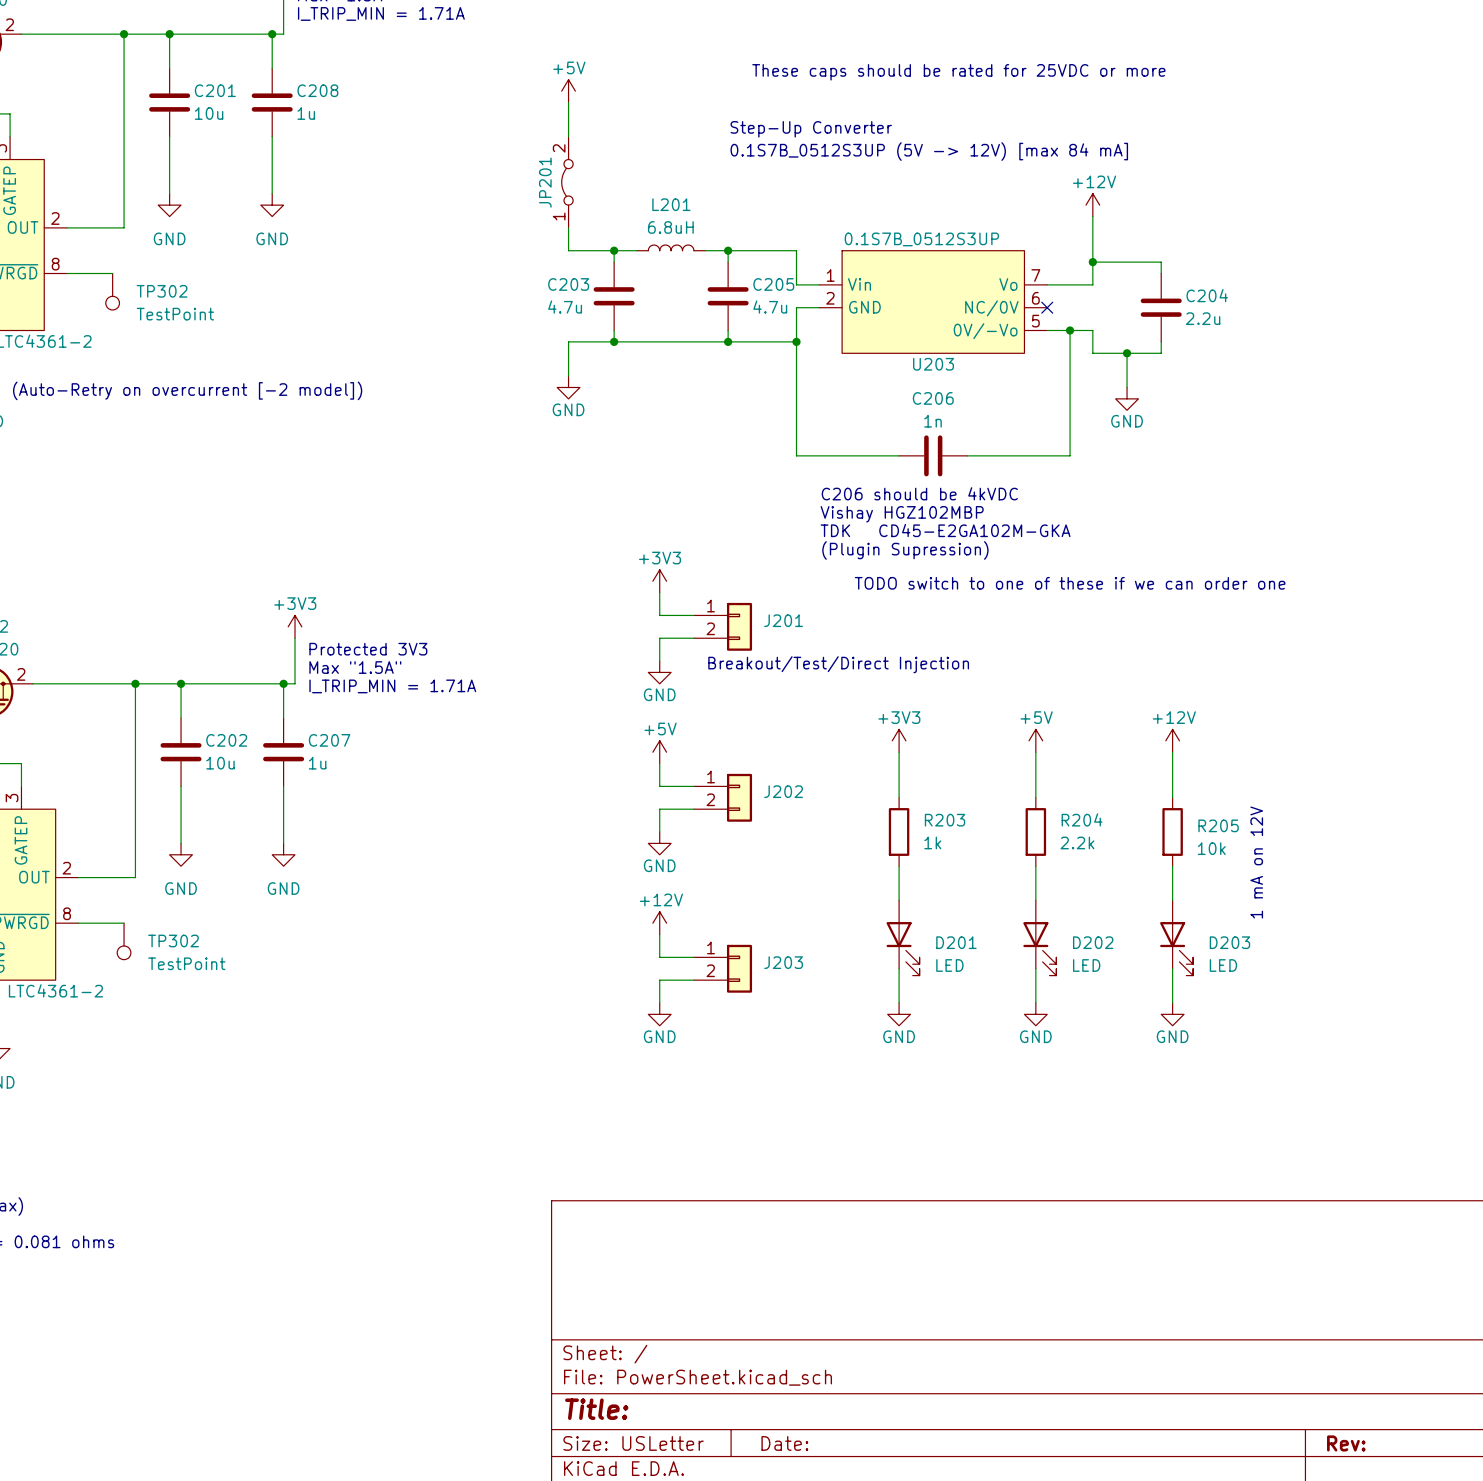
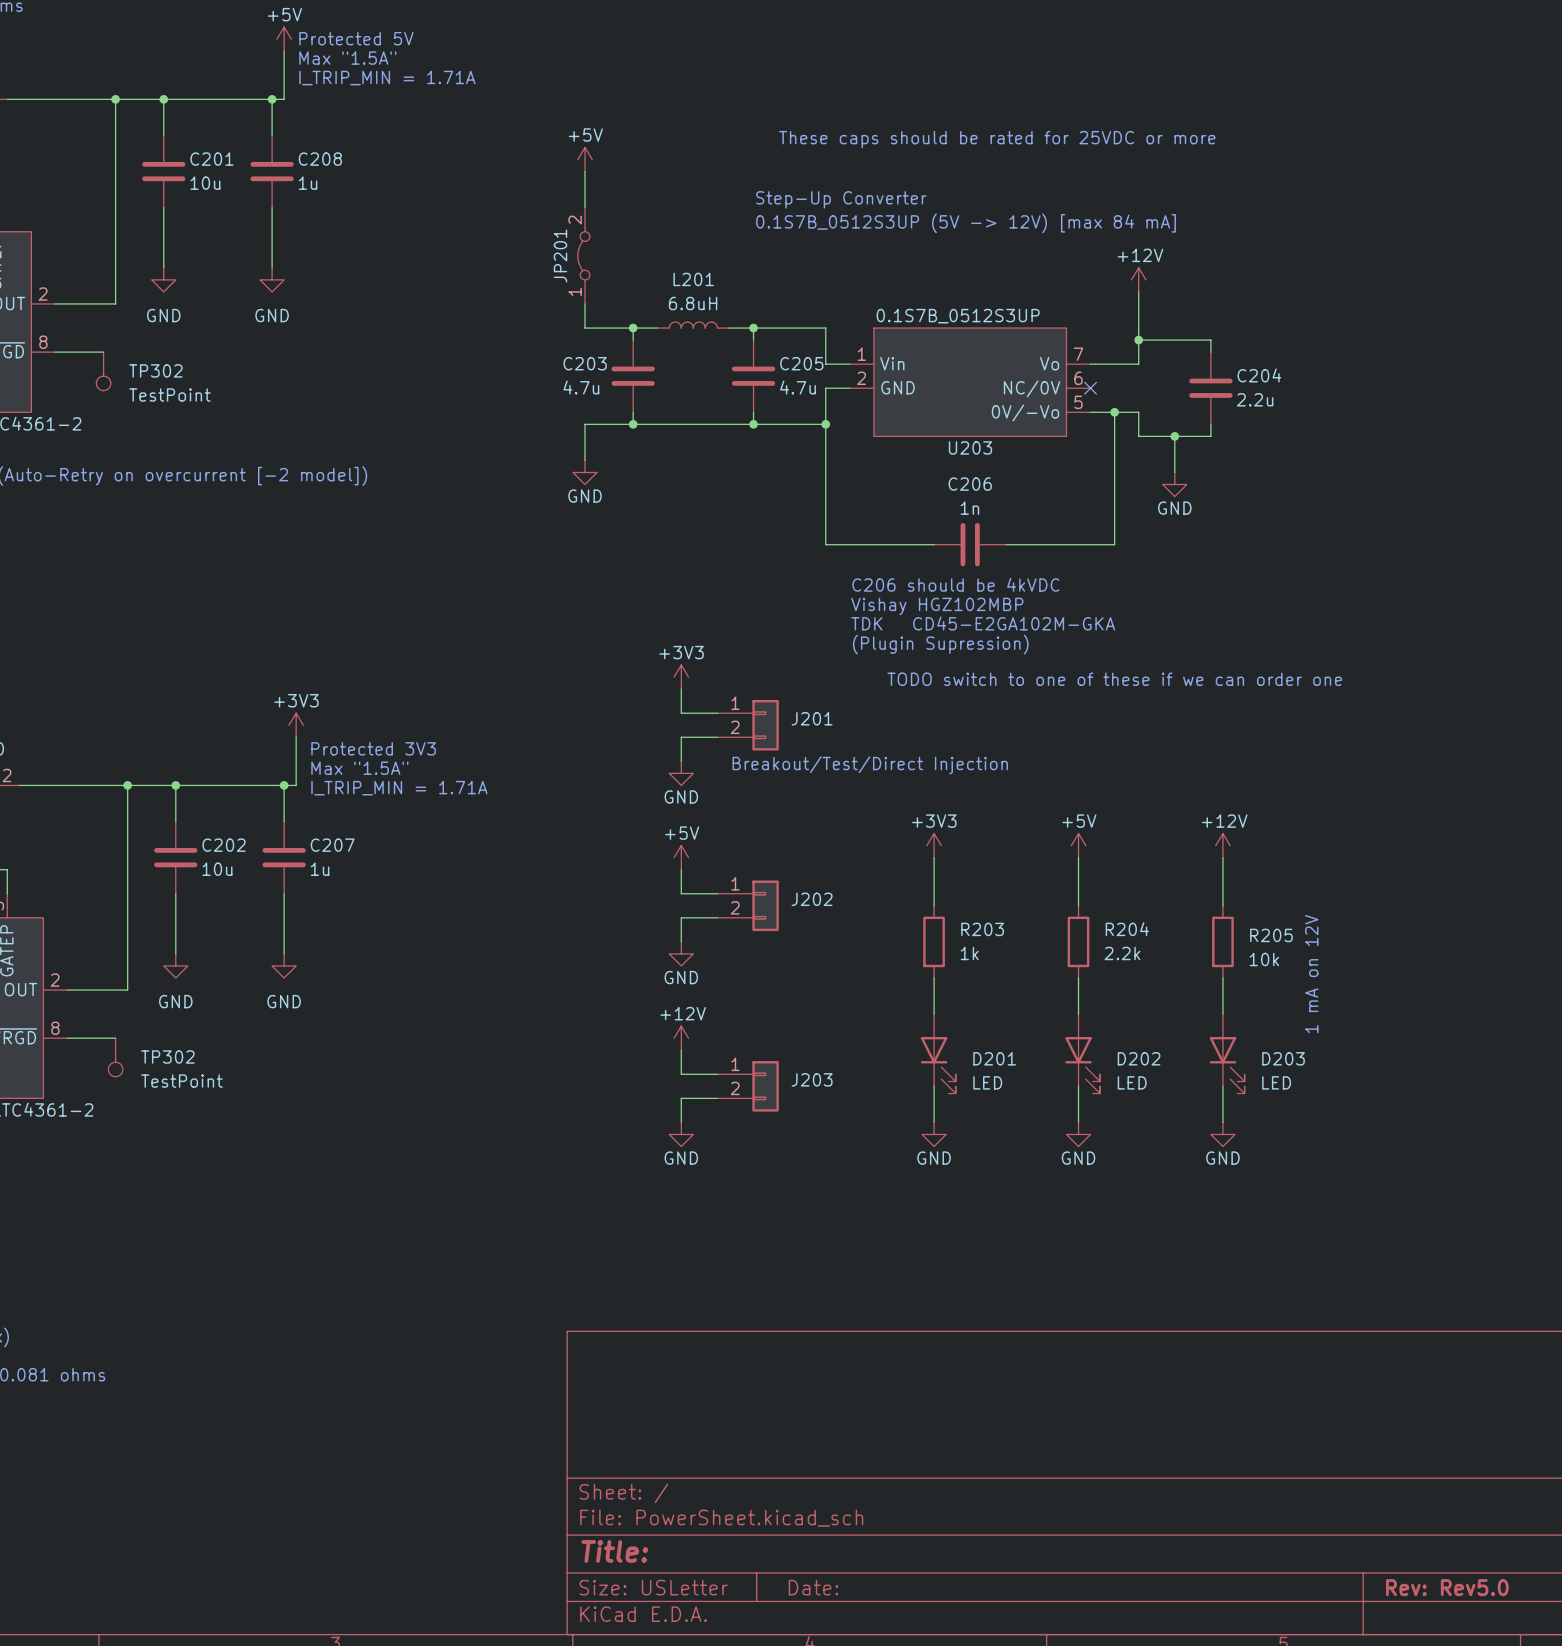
title block: Rev: (1346, 1443) -> Rev: Rev5.0 (1447, 1587)

